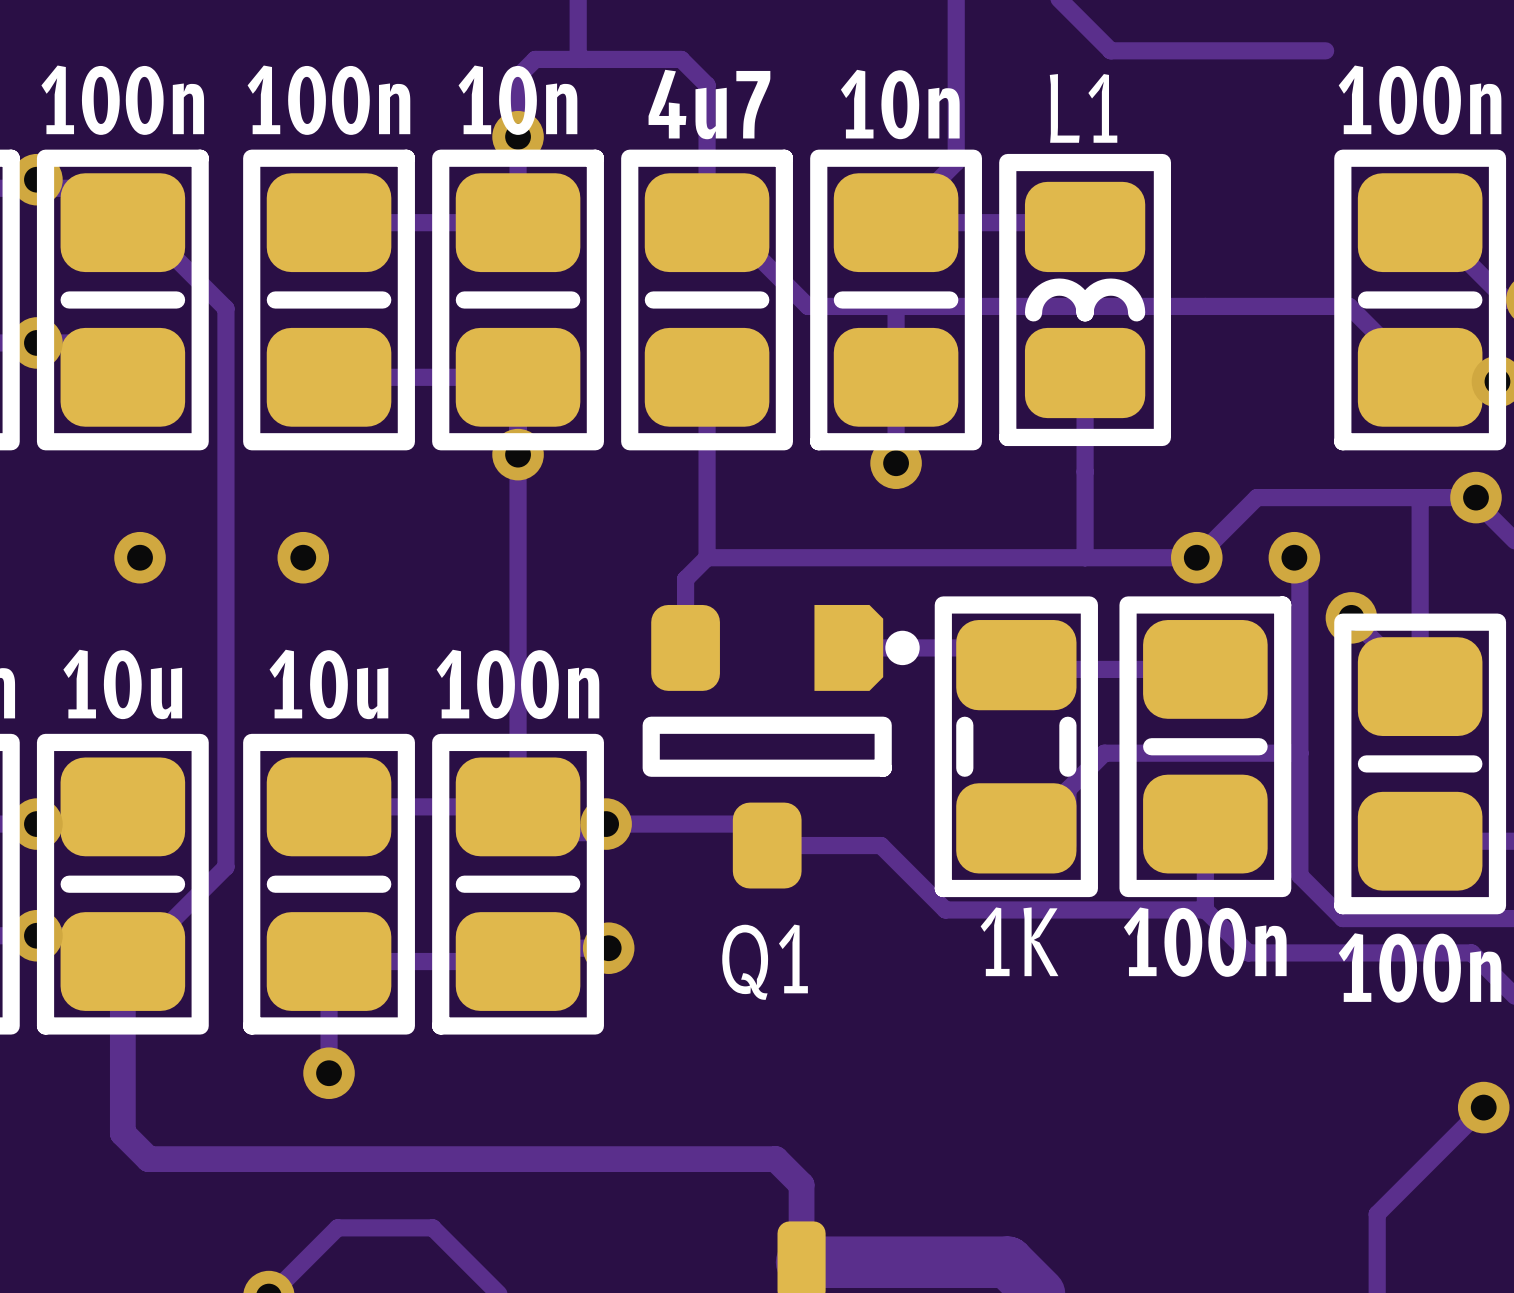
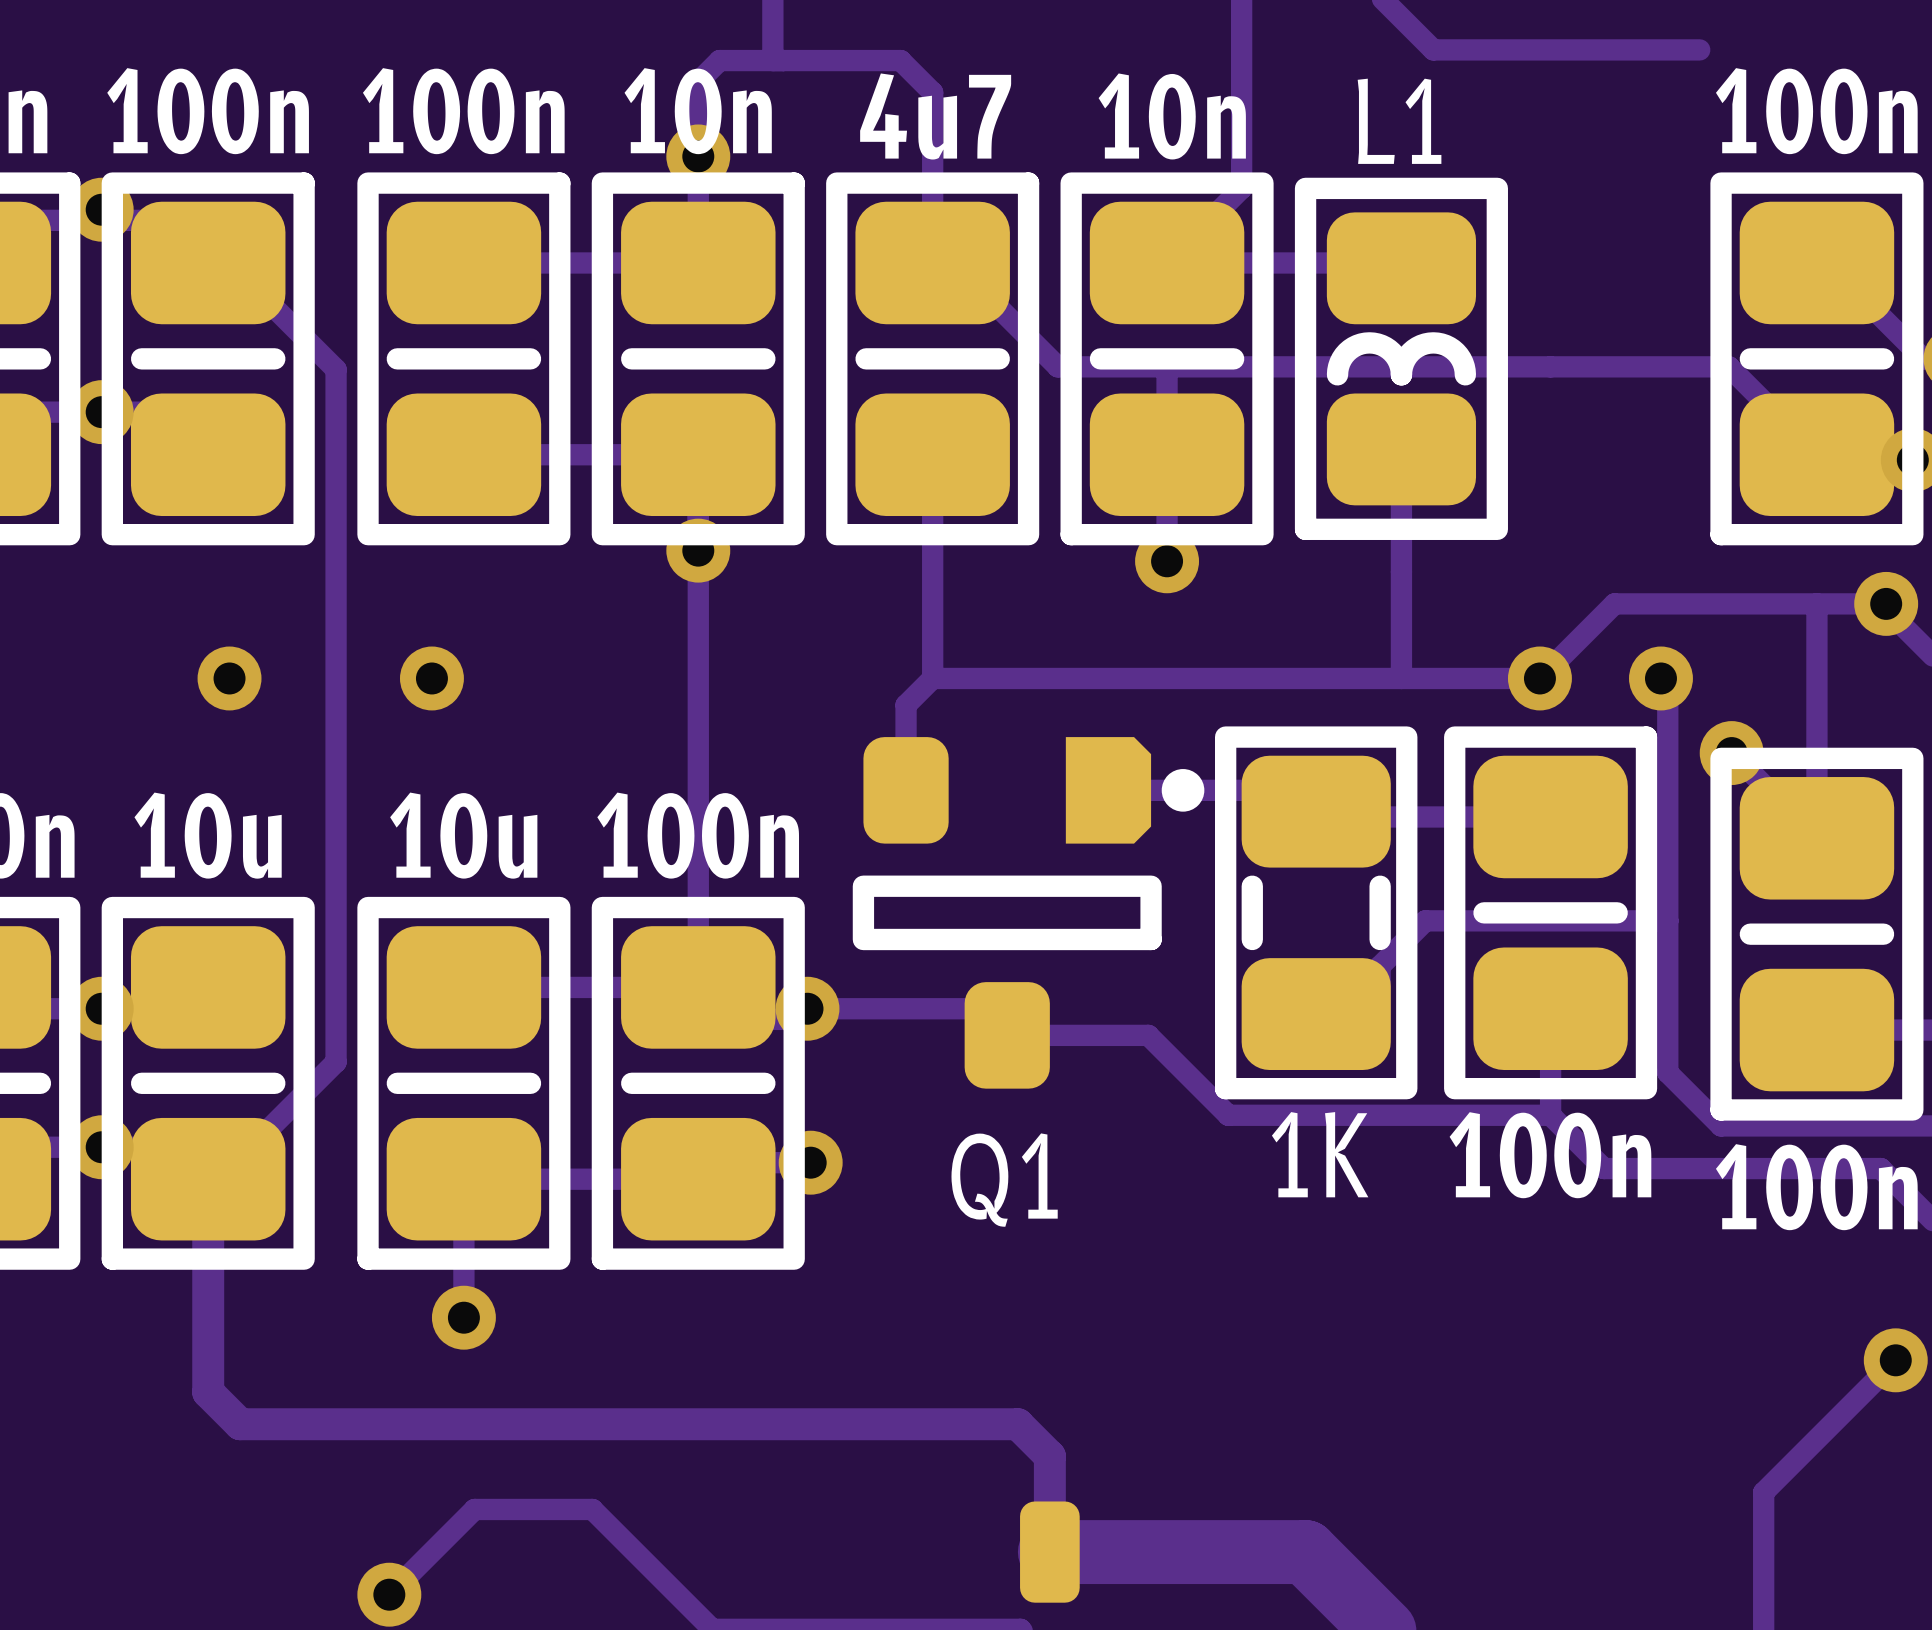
Q1 footprint: [642, 604, 920, 889] -> [852, 737, 1205, 1089]

